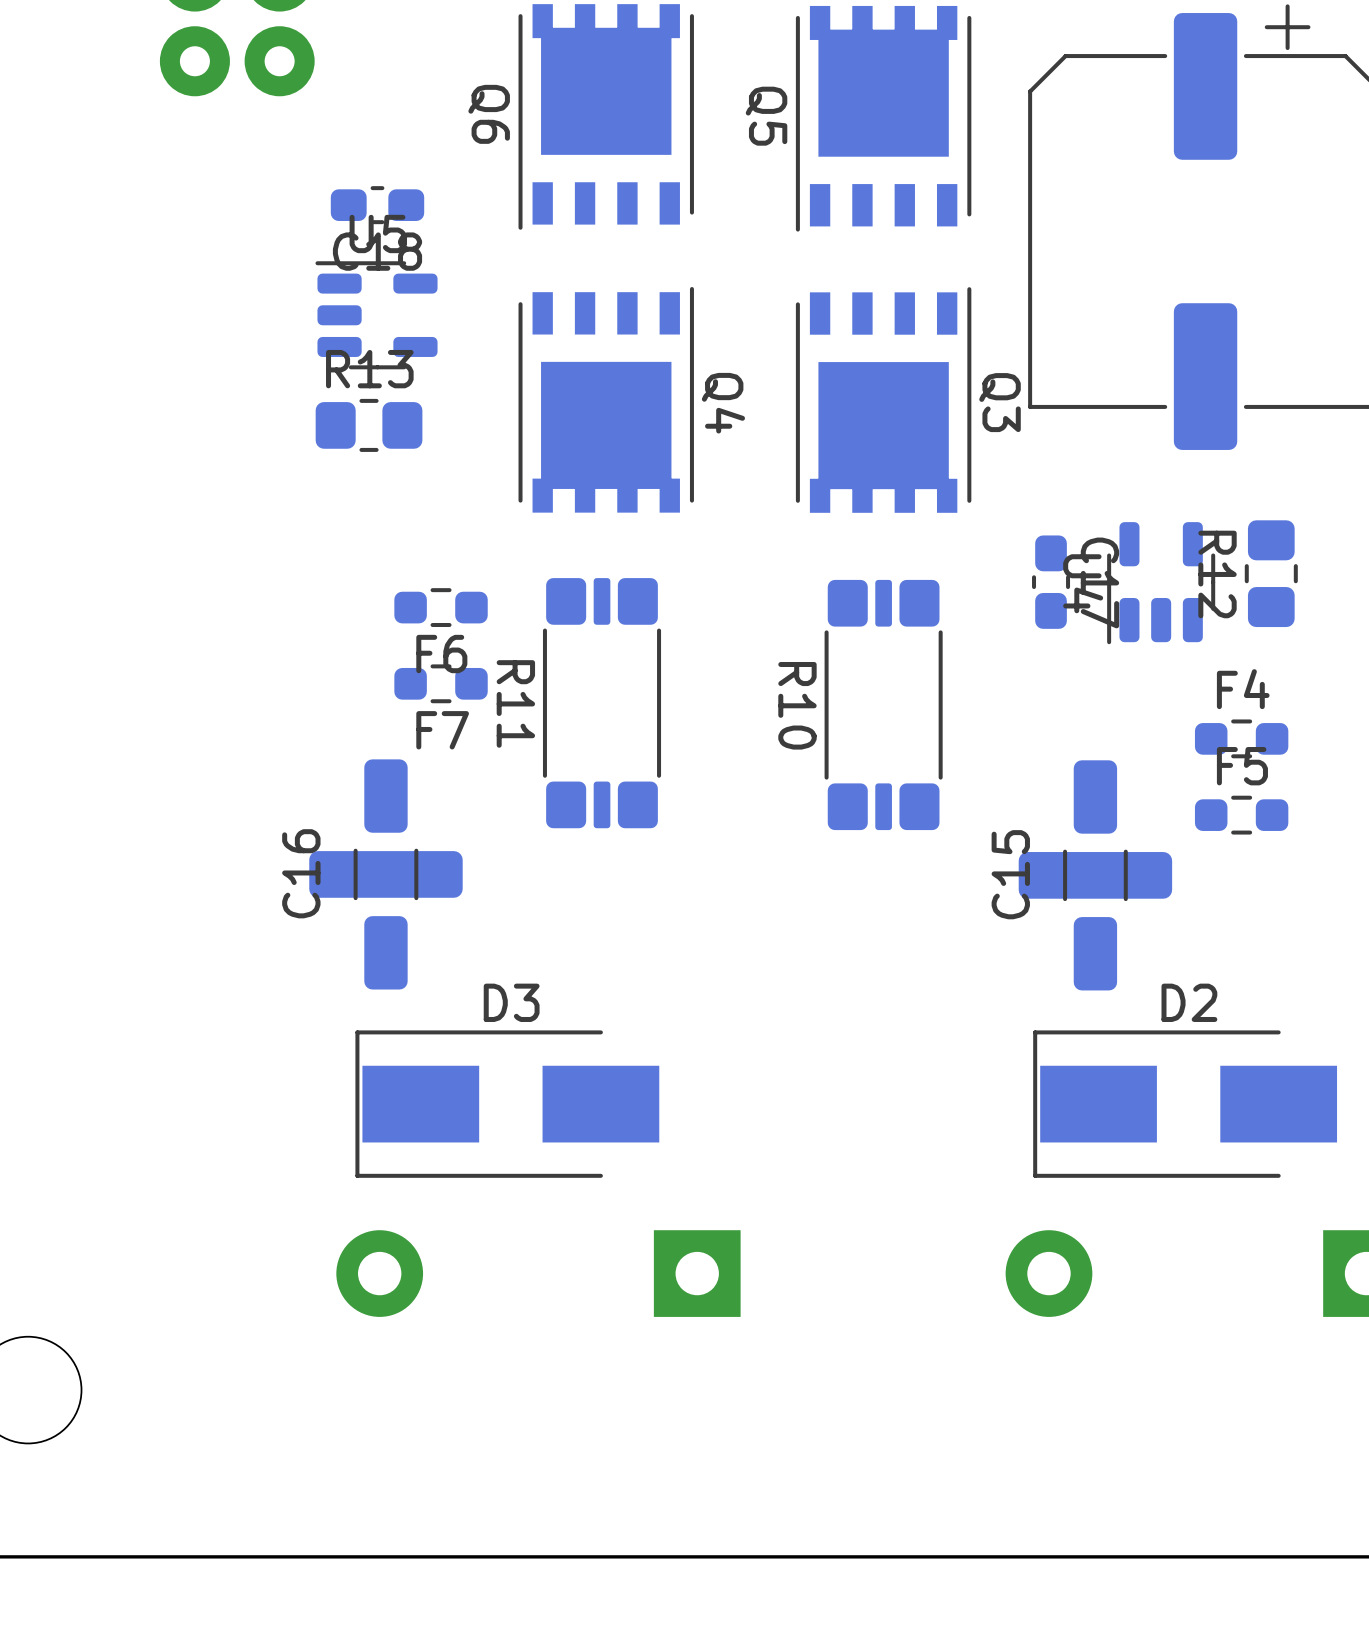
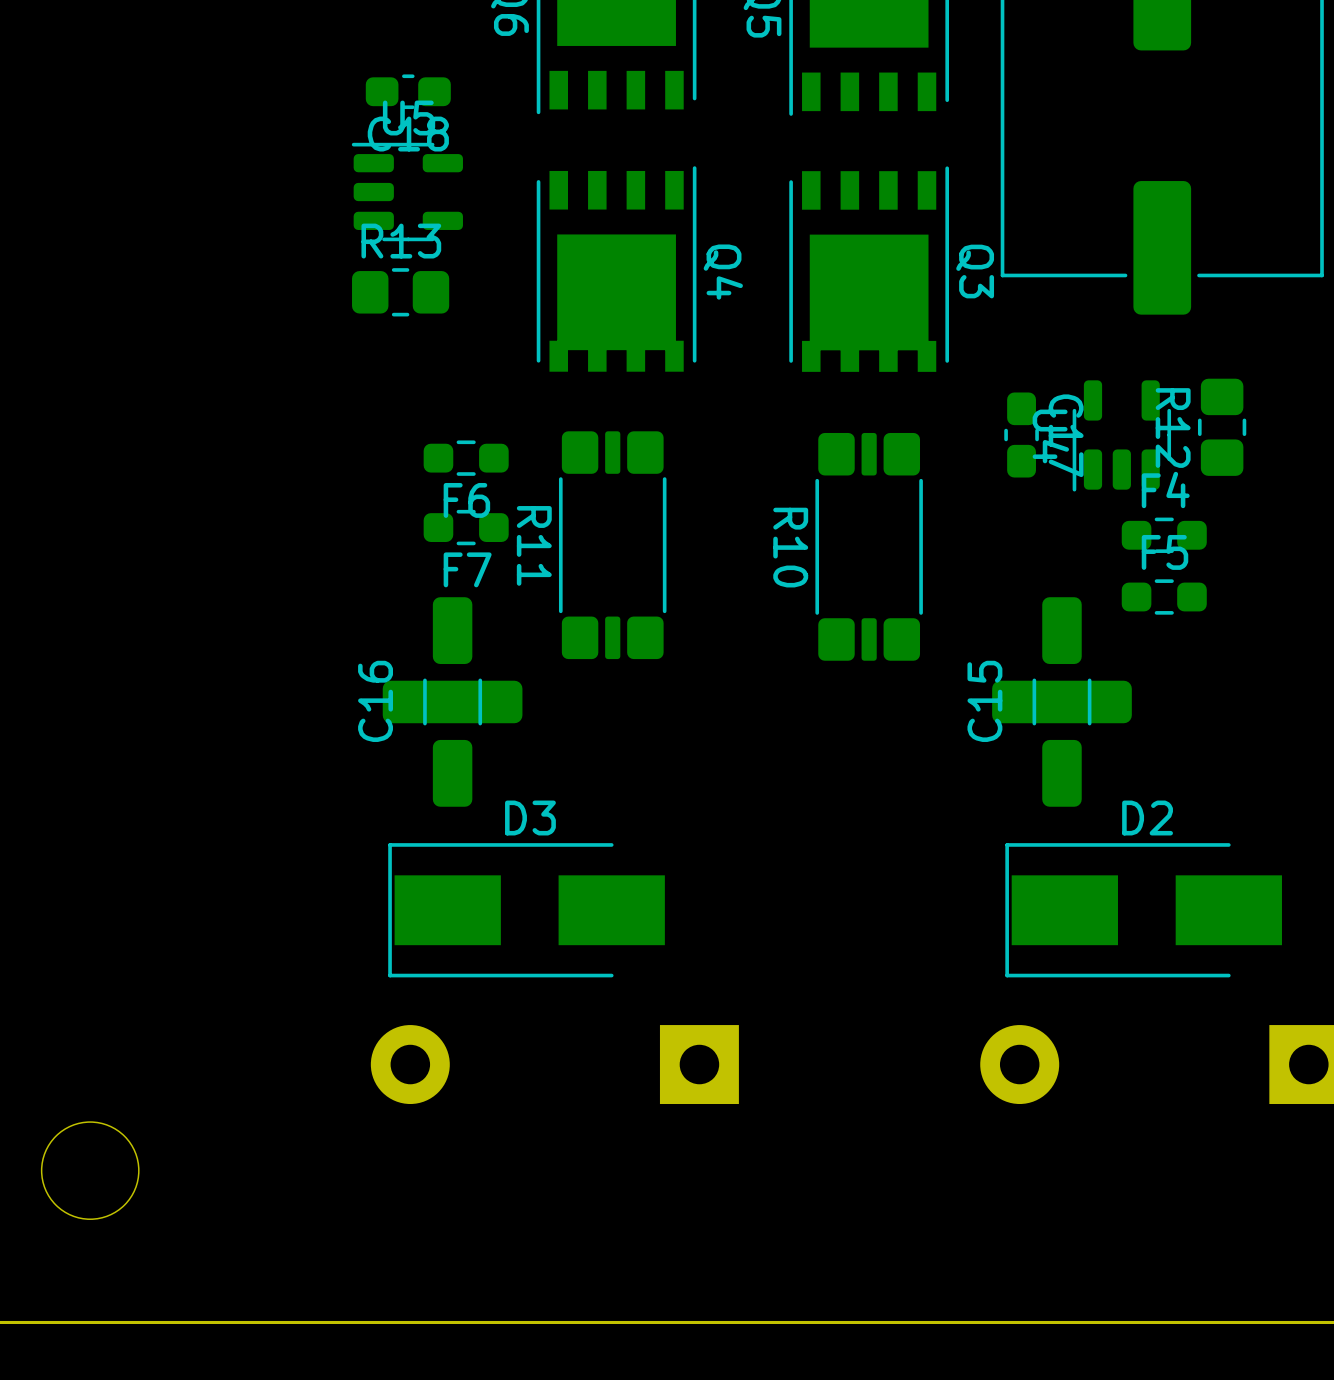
F4 position: (1241, 738) -> (1164, 535)
F5 position: (1241, 815) -> (1164, 596)
C16 position: (385, 874) -> (452, 701)

